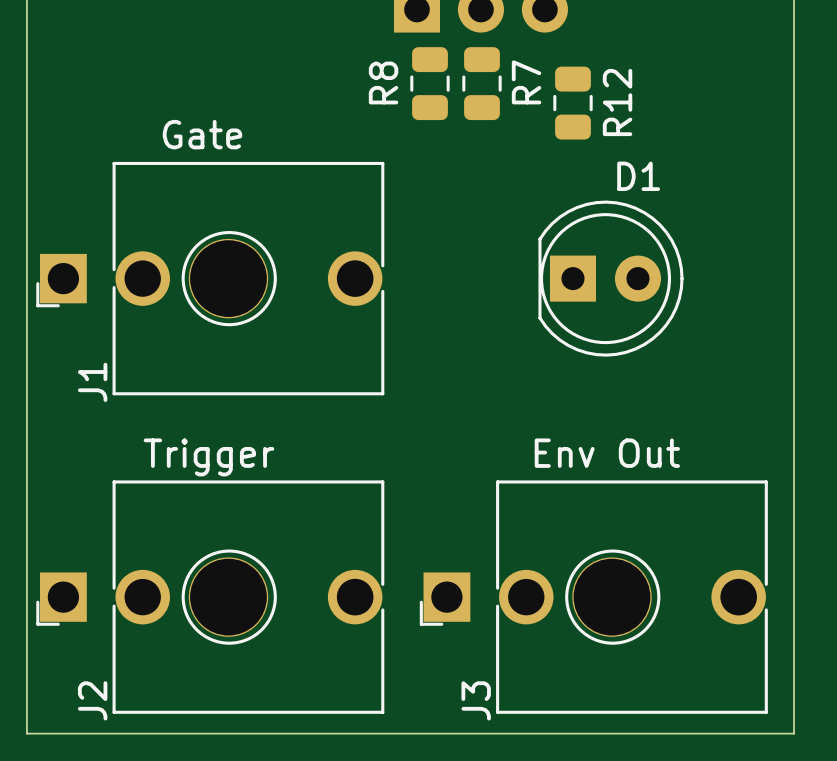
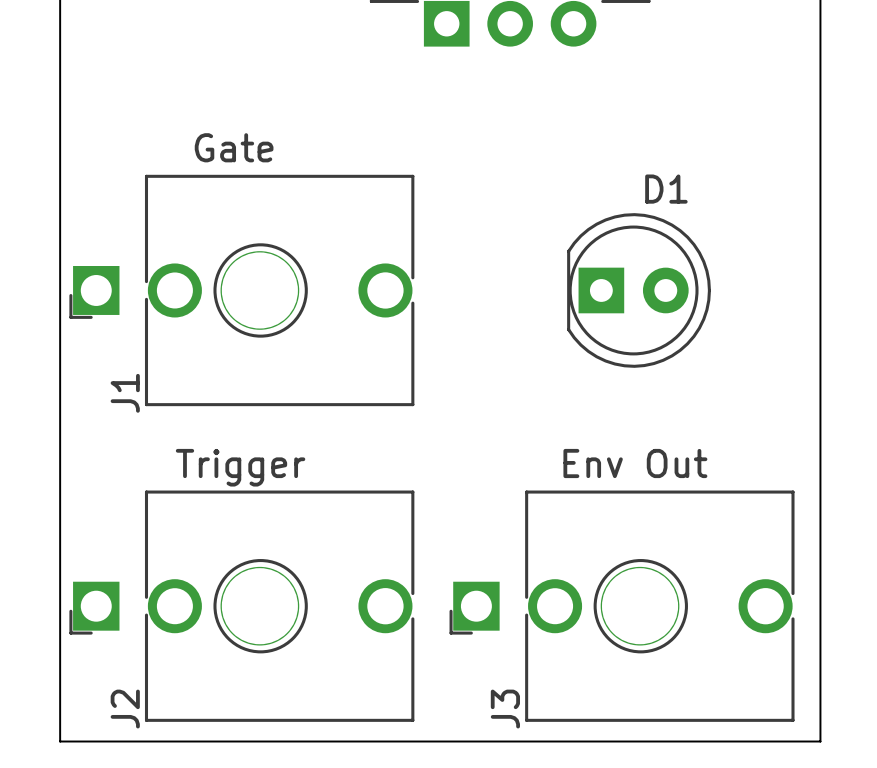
R8: (429, 83) -> none
R7: (481, 83) -> none
R12: (572, 103) -> none

